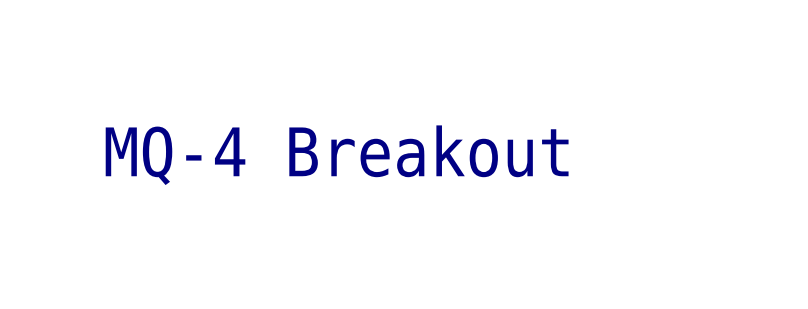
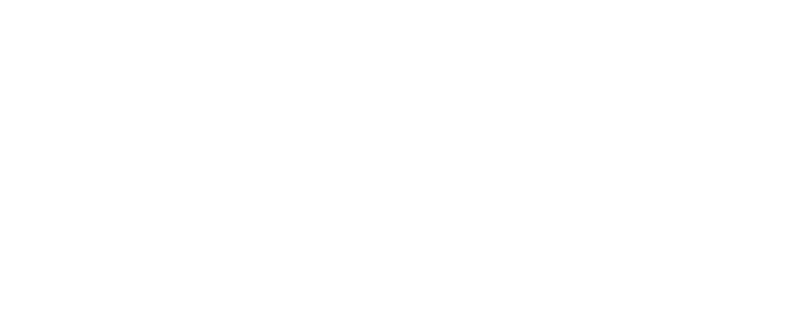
text: MQ-4 Breakout (337, 155) -> none

